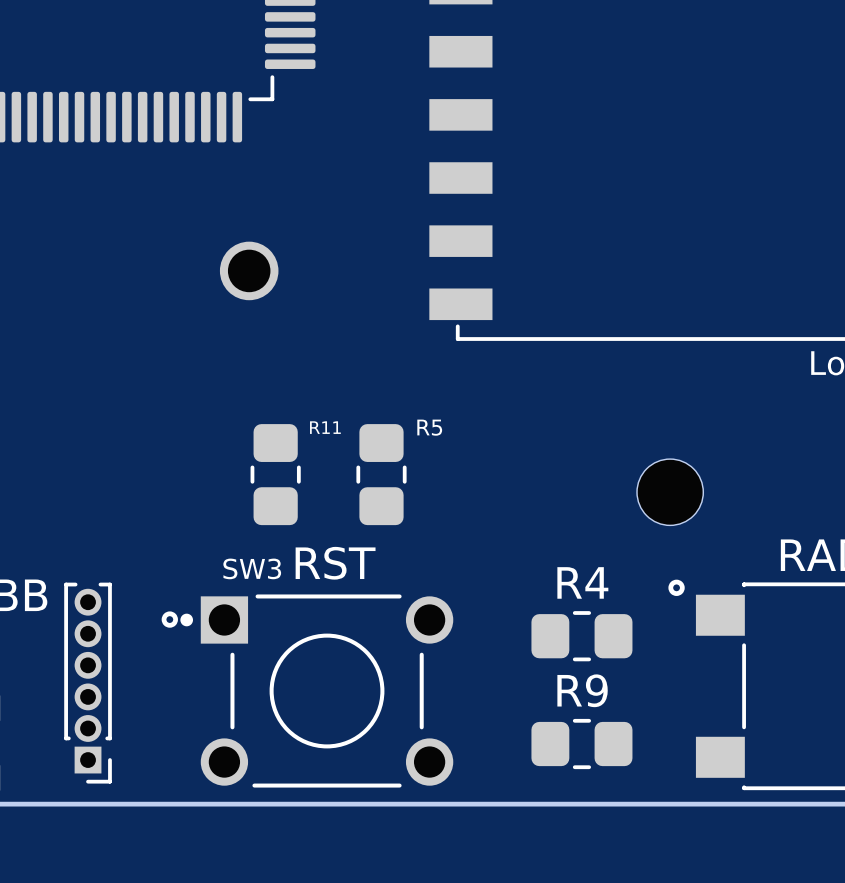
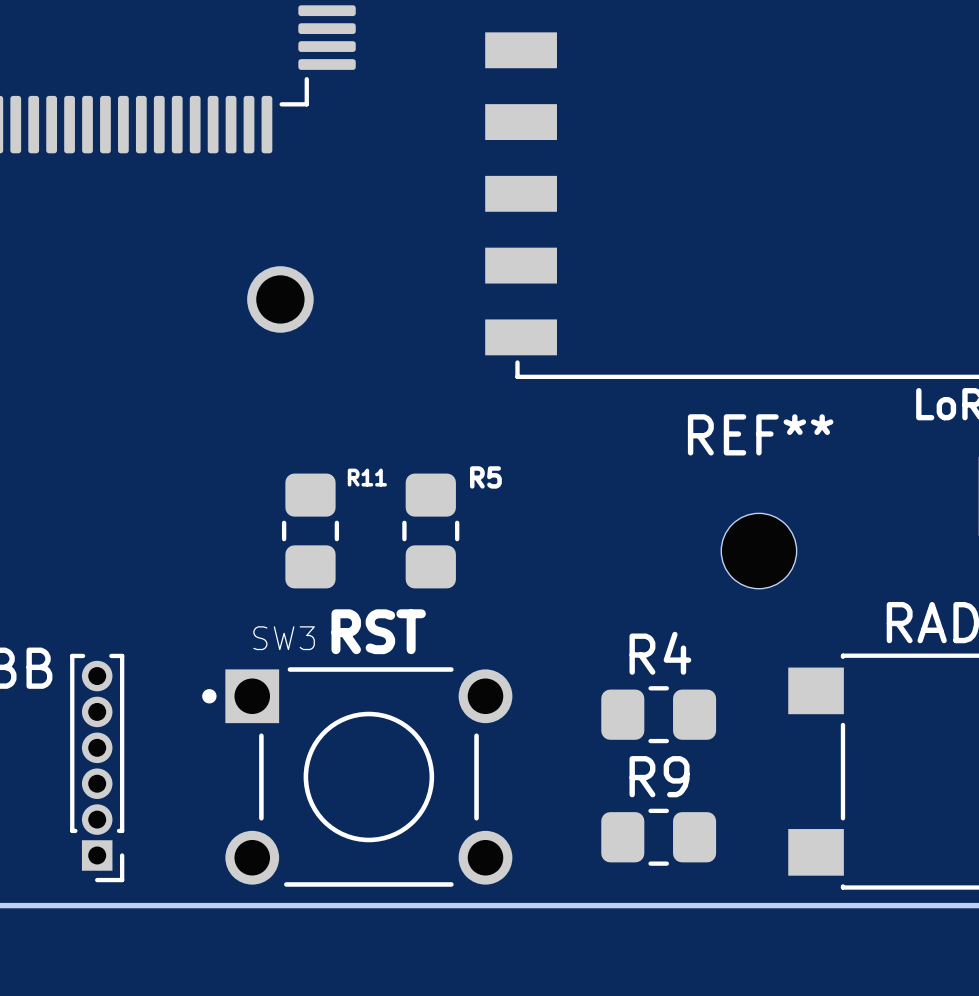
REF** name: none -> REF** (760, 434)
drawing: [668, 579, 685, 596] -> none
drawing: [161, 611, 178, 628] -> none

